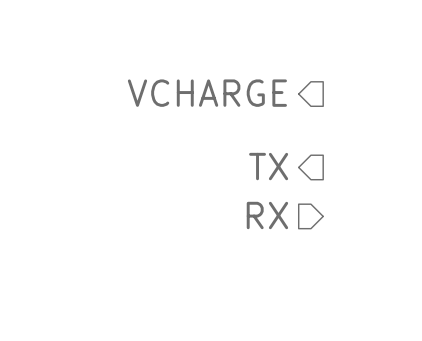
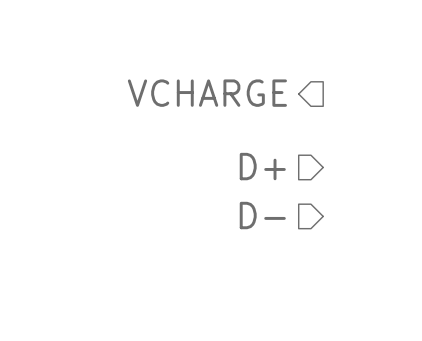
hierarchical label shape: output (268, 166) -> input (262, 166)
hierarchical label: TX (268, 166) -> D+ (262, 166)
hierarchical label: RX (267, 215) -> D- (262, 215)

